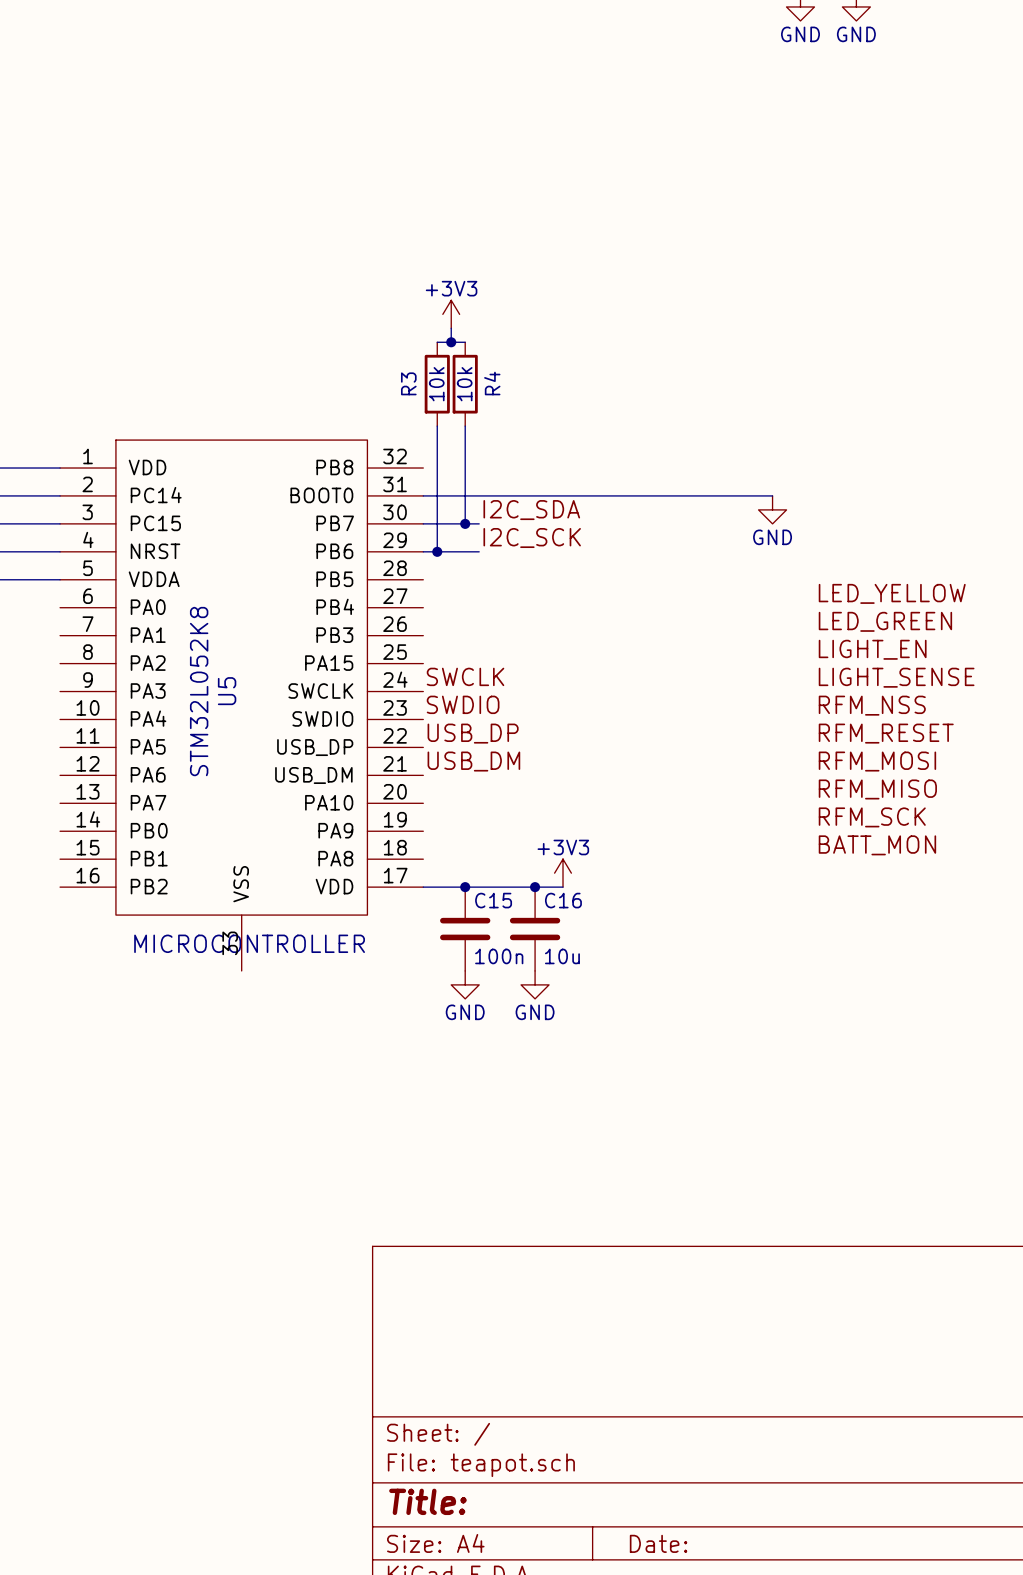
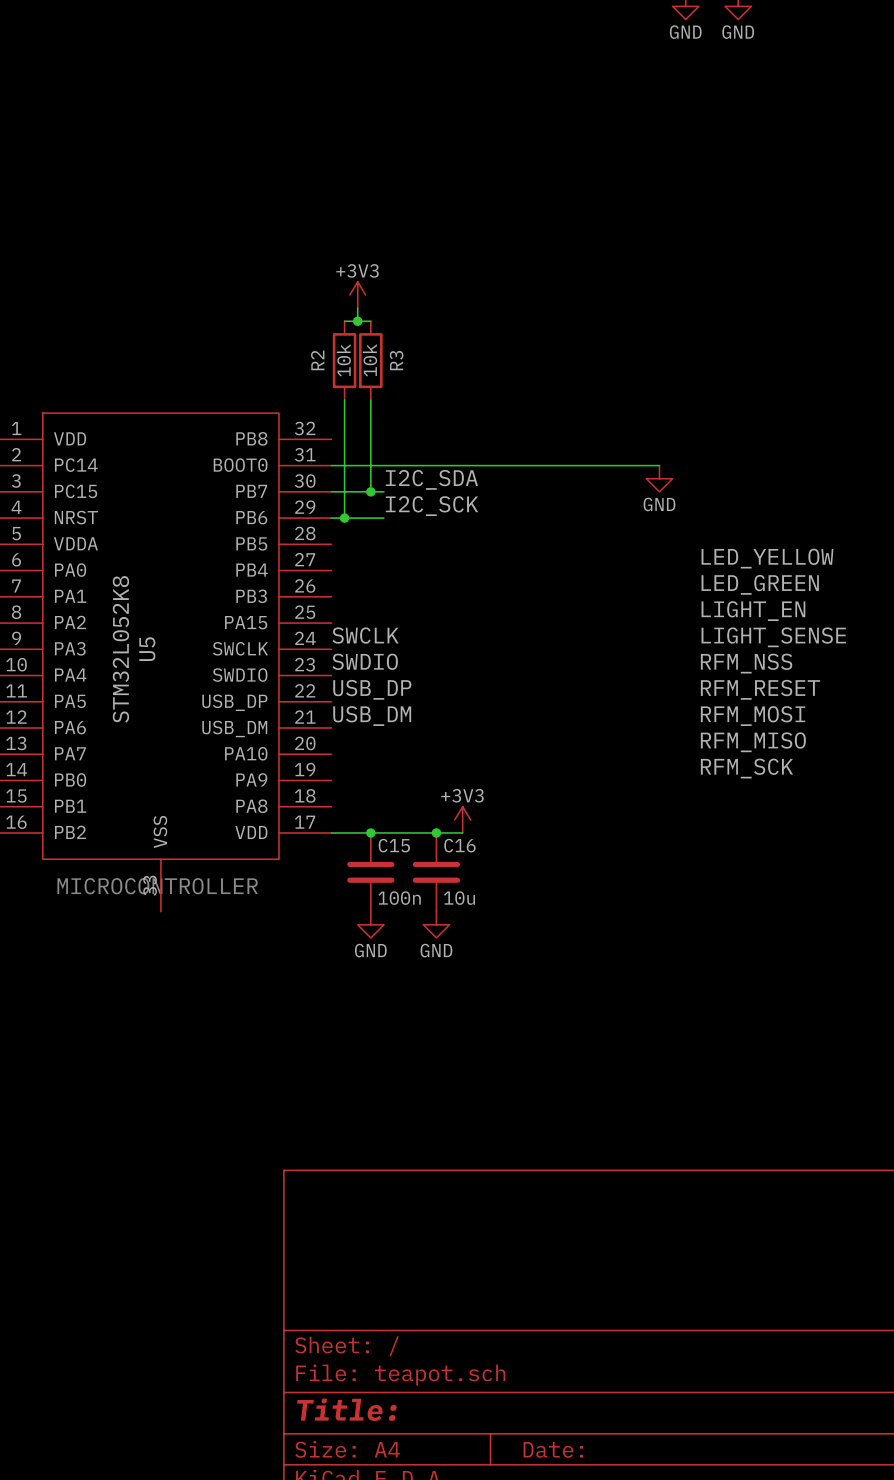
R3 name: R3 (408, 383) -> R2 (317, 360)
R4 name: R4 (492, 383) -> R3 (396, 360)
label: BATT_MON (877, 845) -> none

